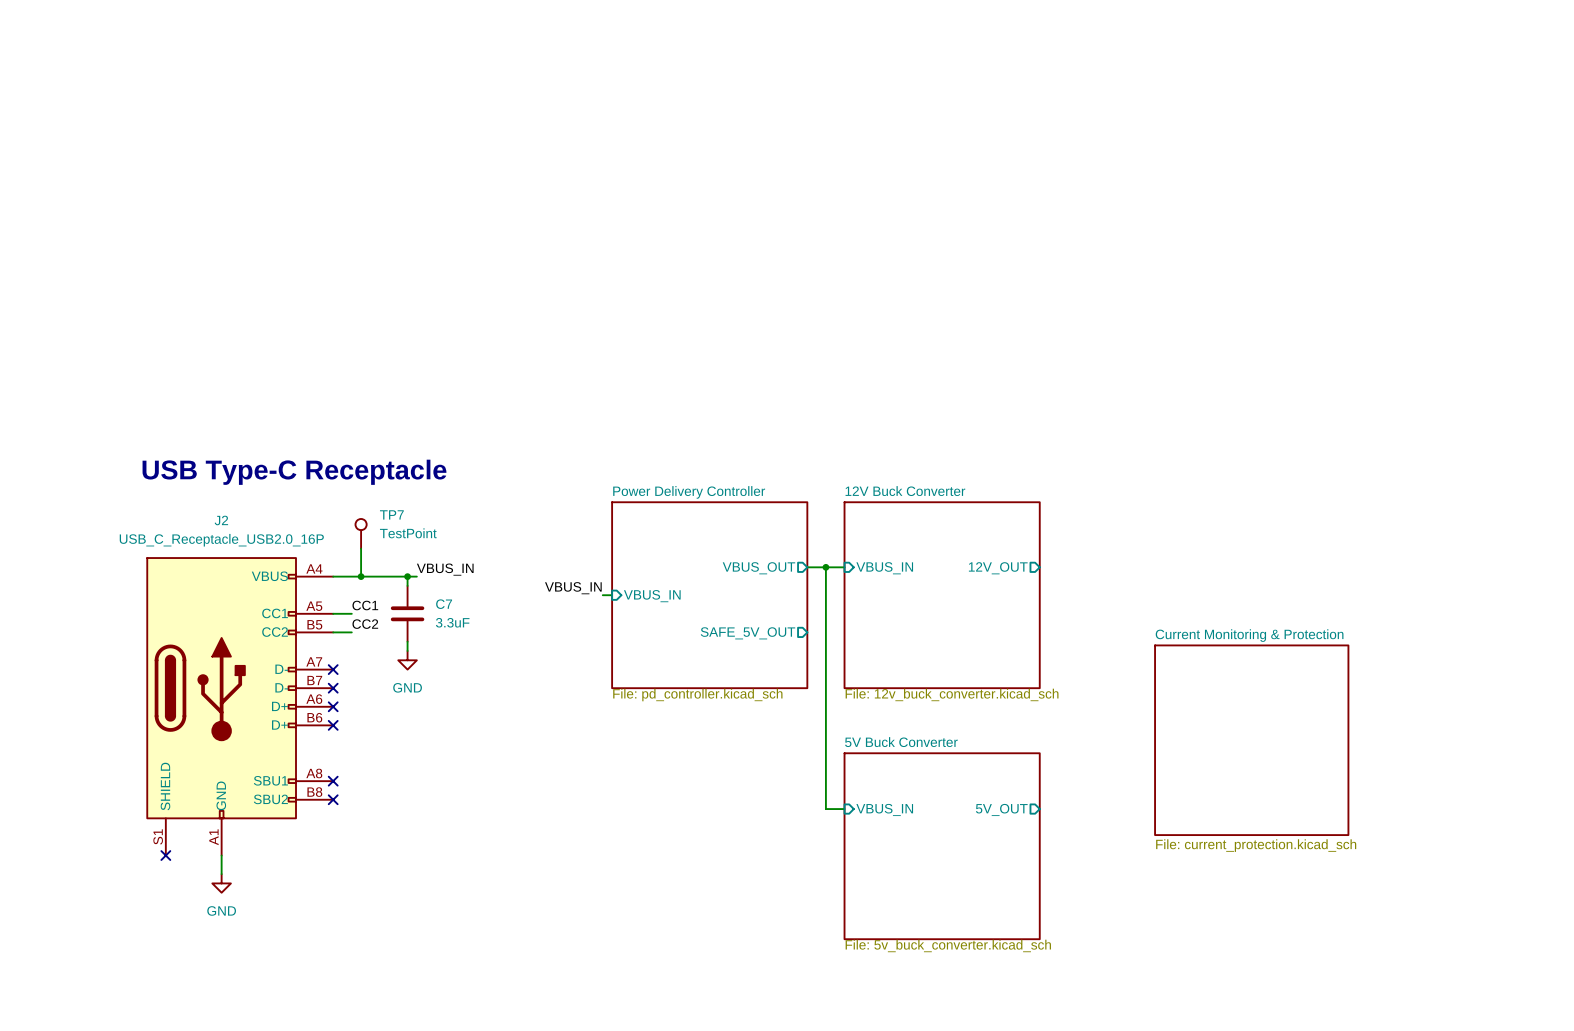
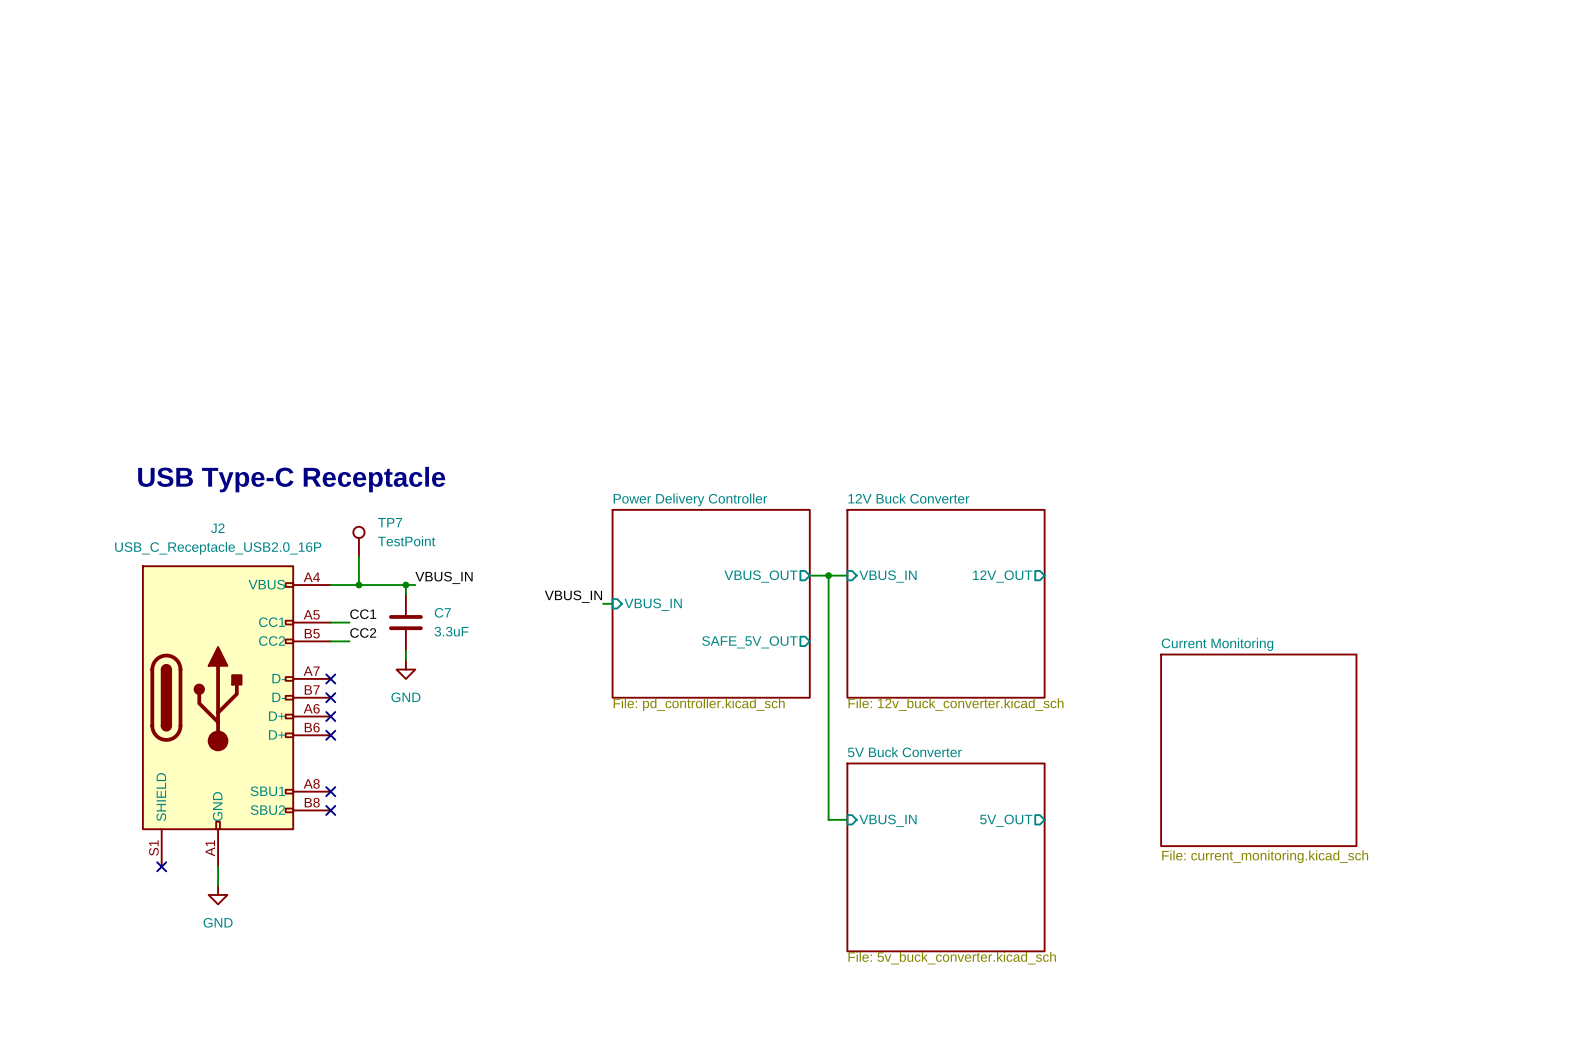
sheet Current Monitoring name: Current Monitoring & Protection (1249, 635) -> Current Monitoring (1217, 644)
sheet Current Monitoring value: File: current_protection.kicad_sch (1256, 845) -> File: current_monitoring.kicad_sch (1265, 856)

